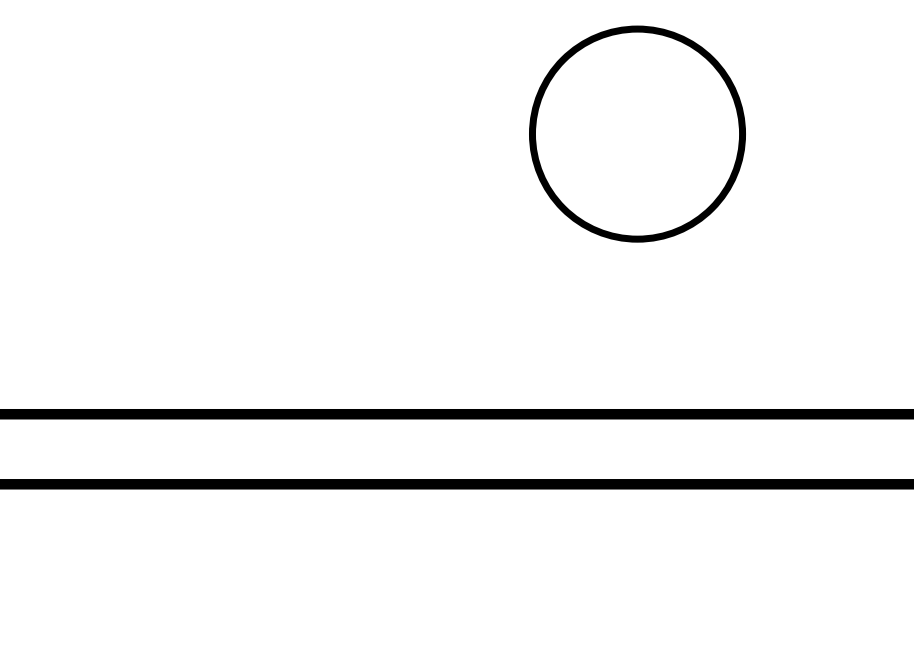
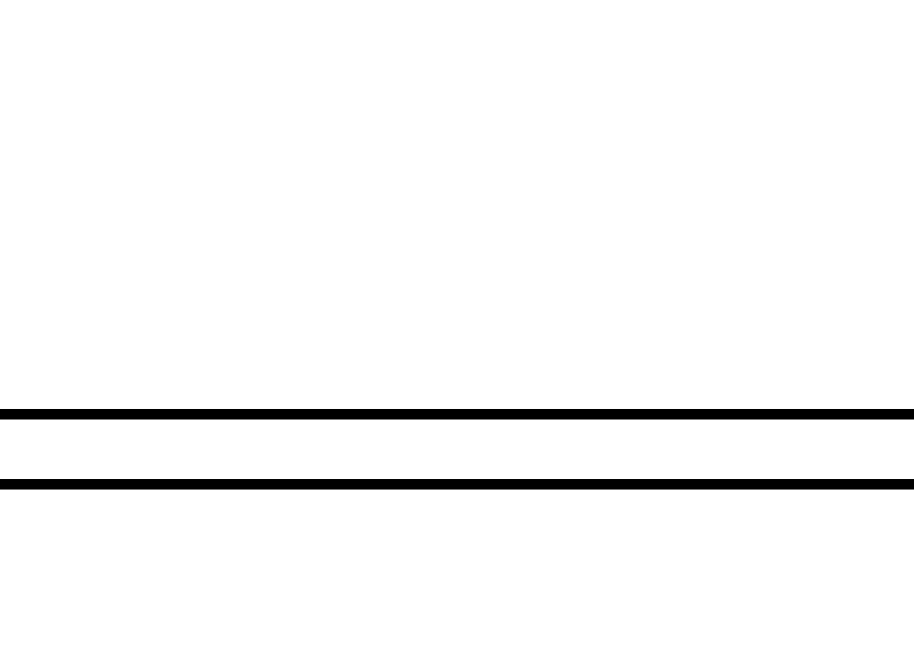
round board edge: [528, 25, 747, 243] -> none

